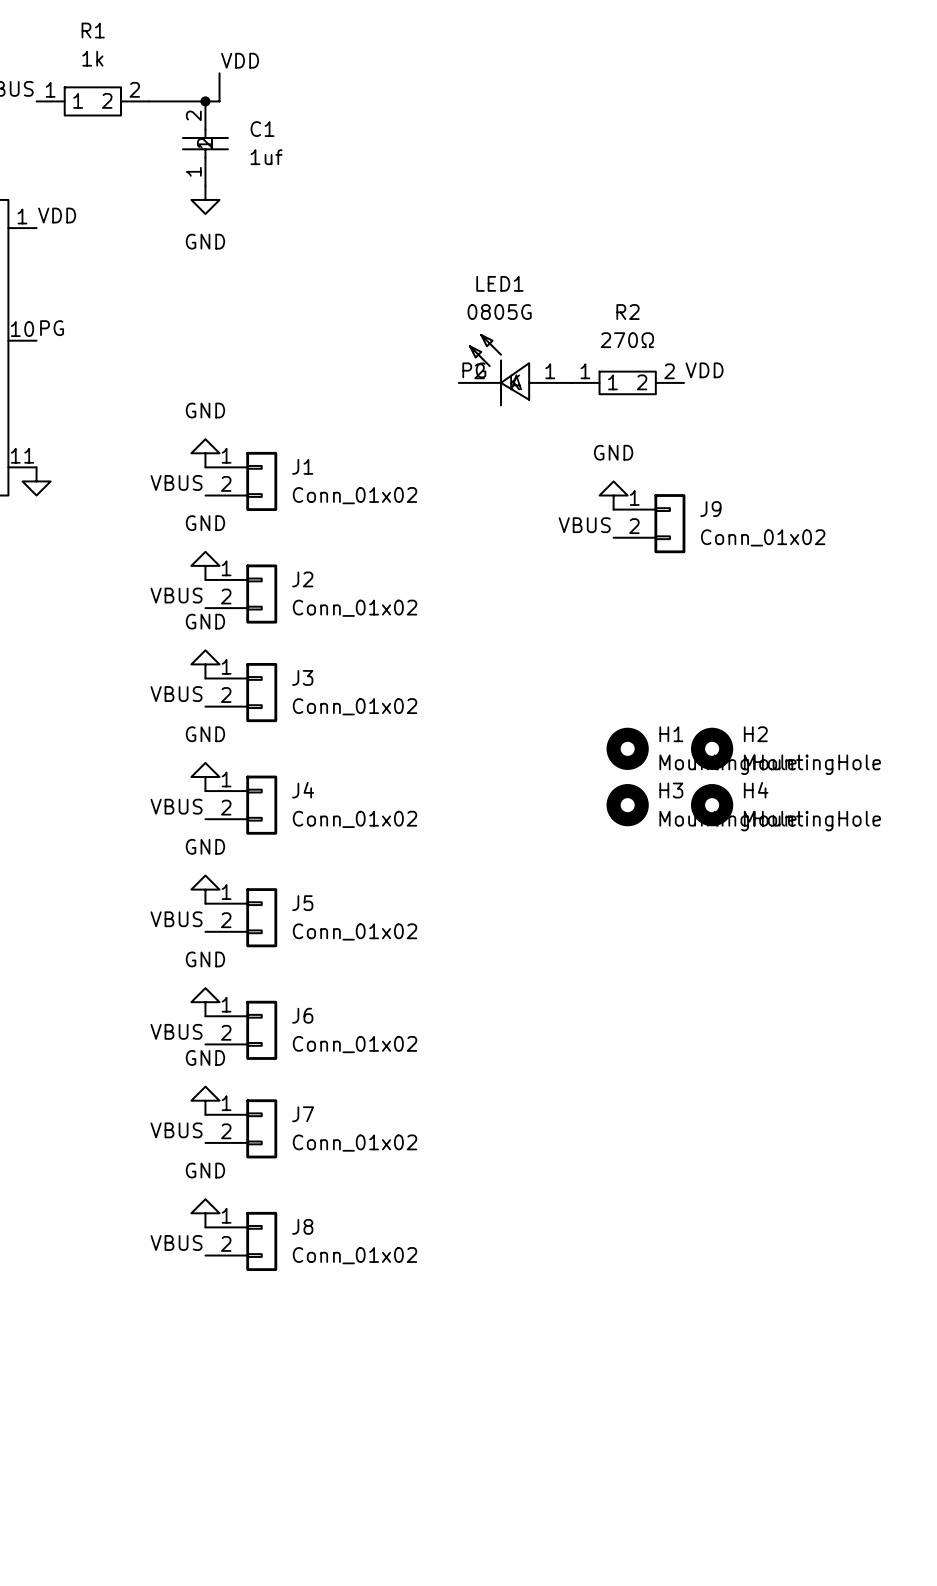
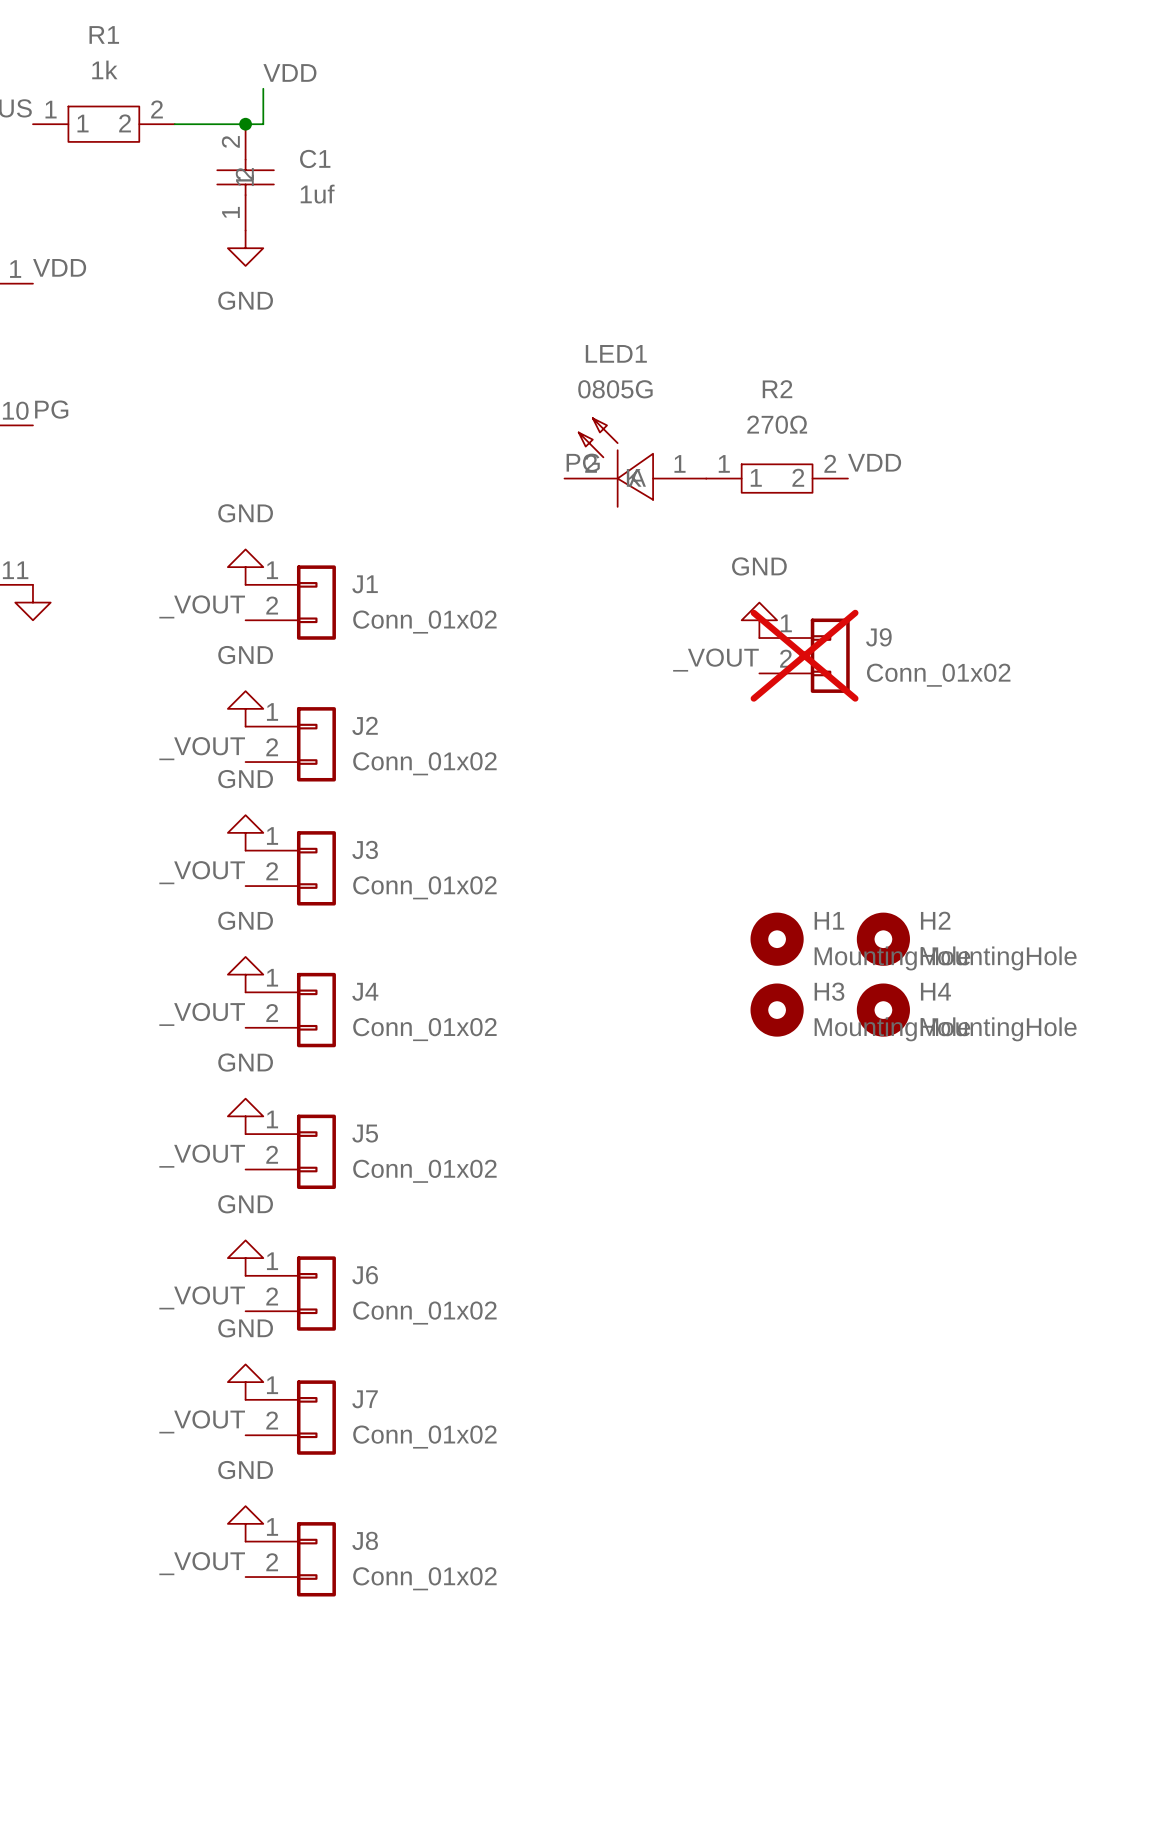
label: VBUS (176, 482) -> _VOUT (202, 606)
J9 do-not-place cross: none -> (804, 655)
label: VBUS (584, 525) -> _VOUT (715, 660)
label: VBUS (176, 595) -> _VOUT (202, 748)
label: VBUS (176, 694) -> _VOUT (202, 872)
label: VBUS (176, 806) -> _VOUT (202, 1014)
label: VBUS (176, 919) -> _VOUT (202, 1156)
label: VBUS (176, 1031) -> _VOUT (202, 1297)
label: VBUS (176, 1130) -> _VOUT (202, 1421)
label: VBUS (176, 1242) -> _VOUT (202, 1563)

